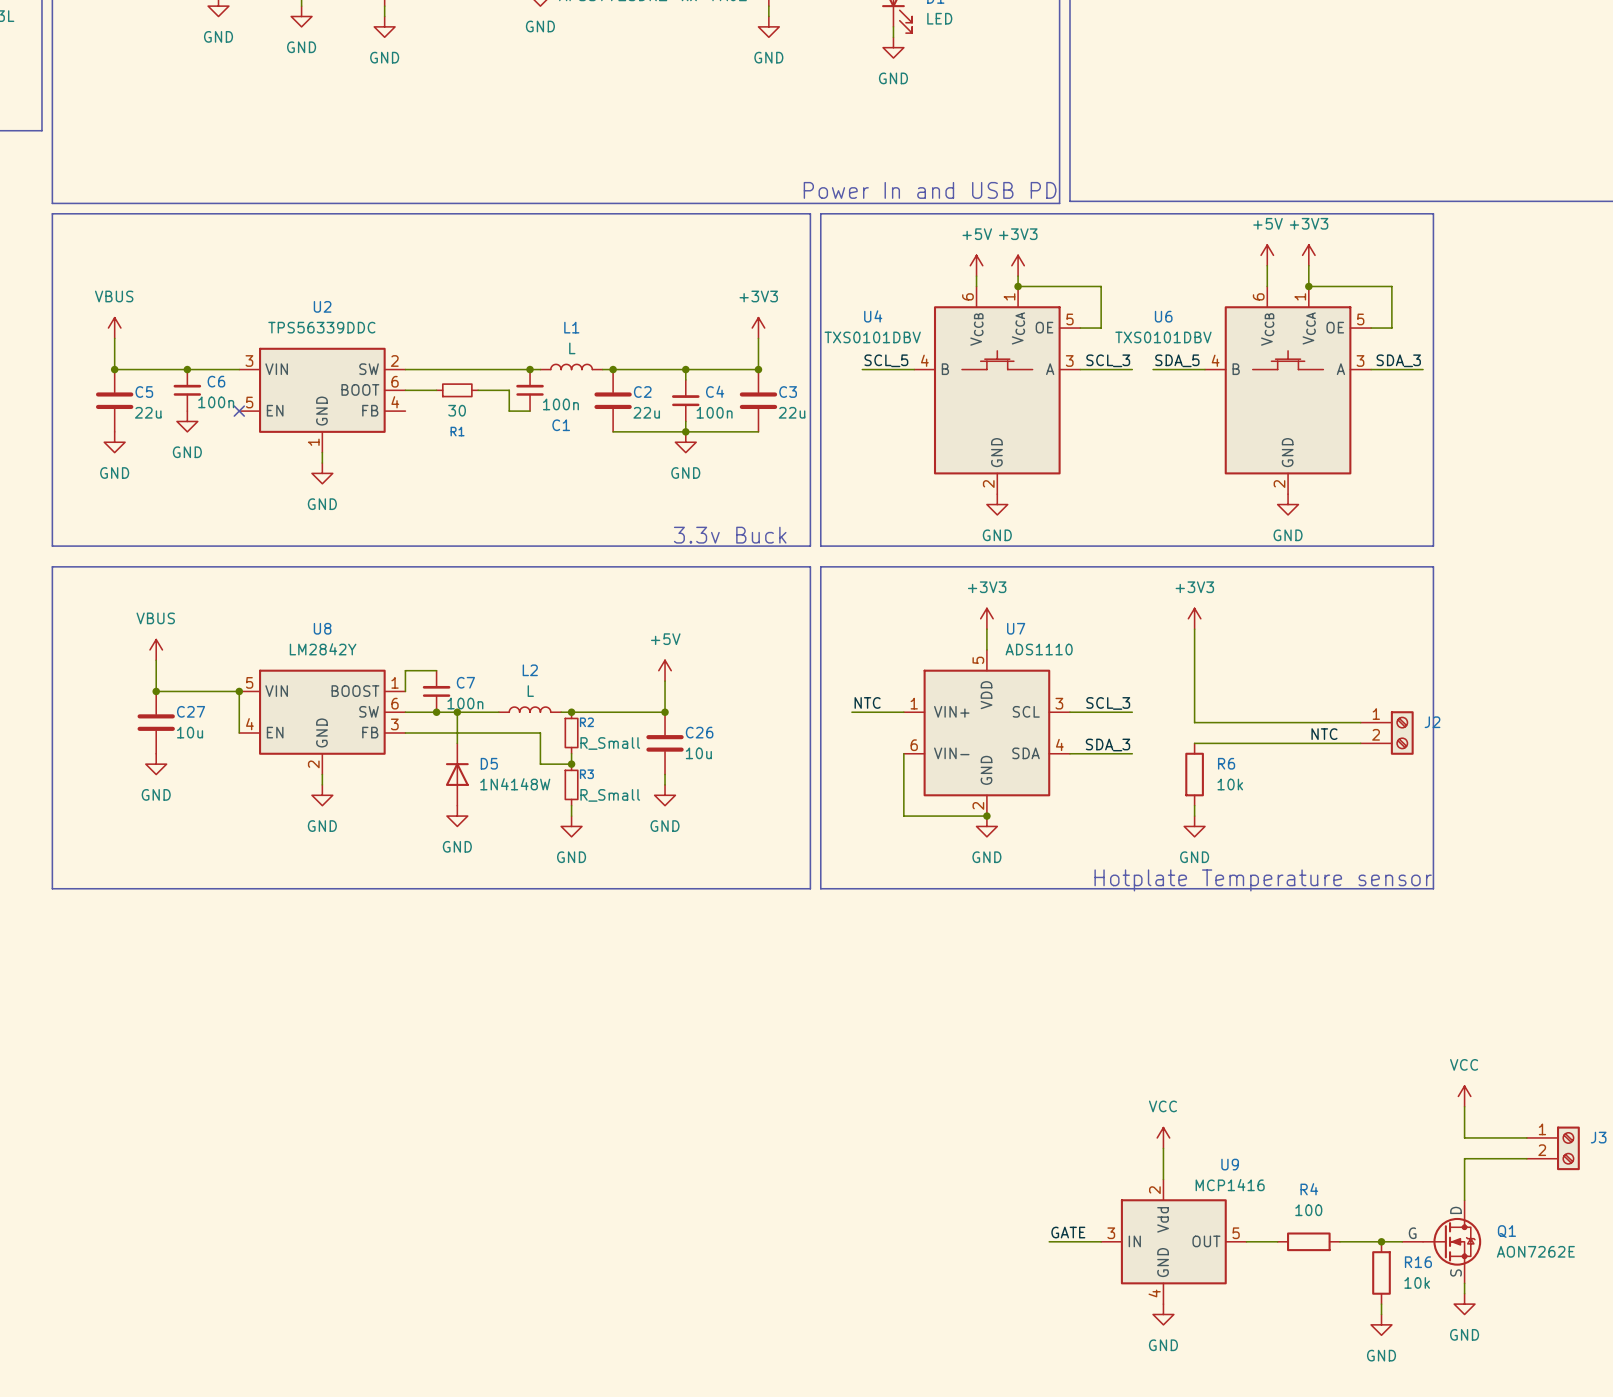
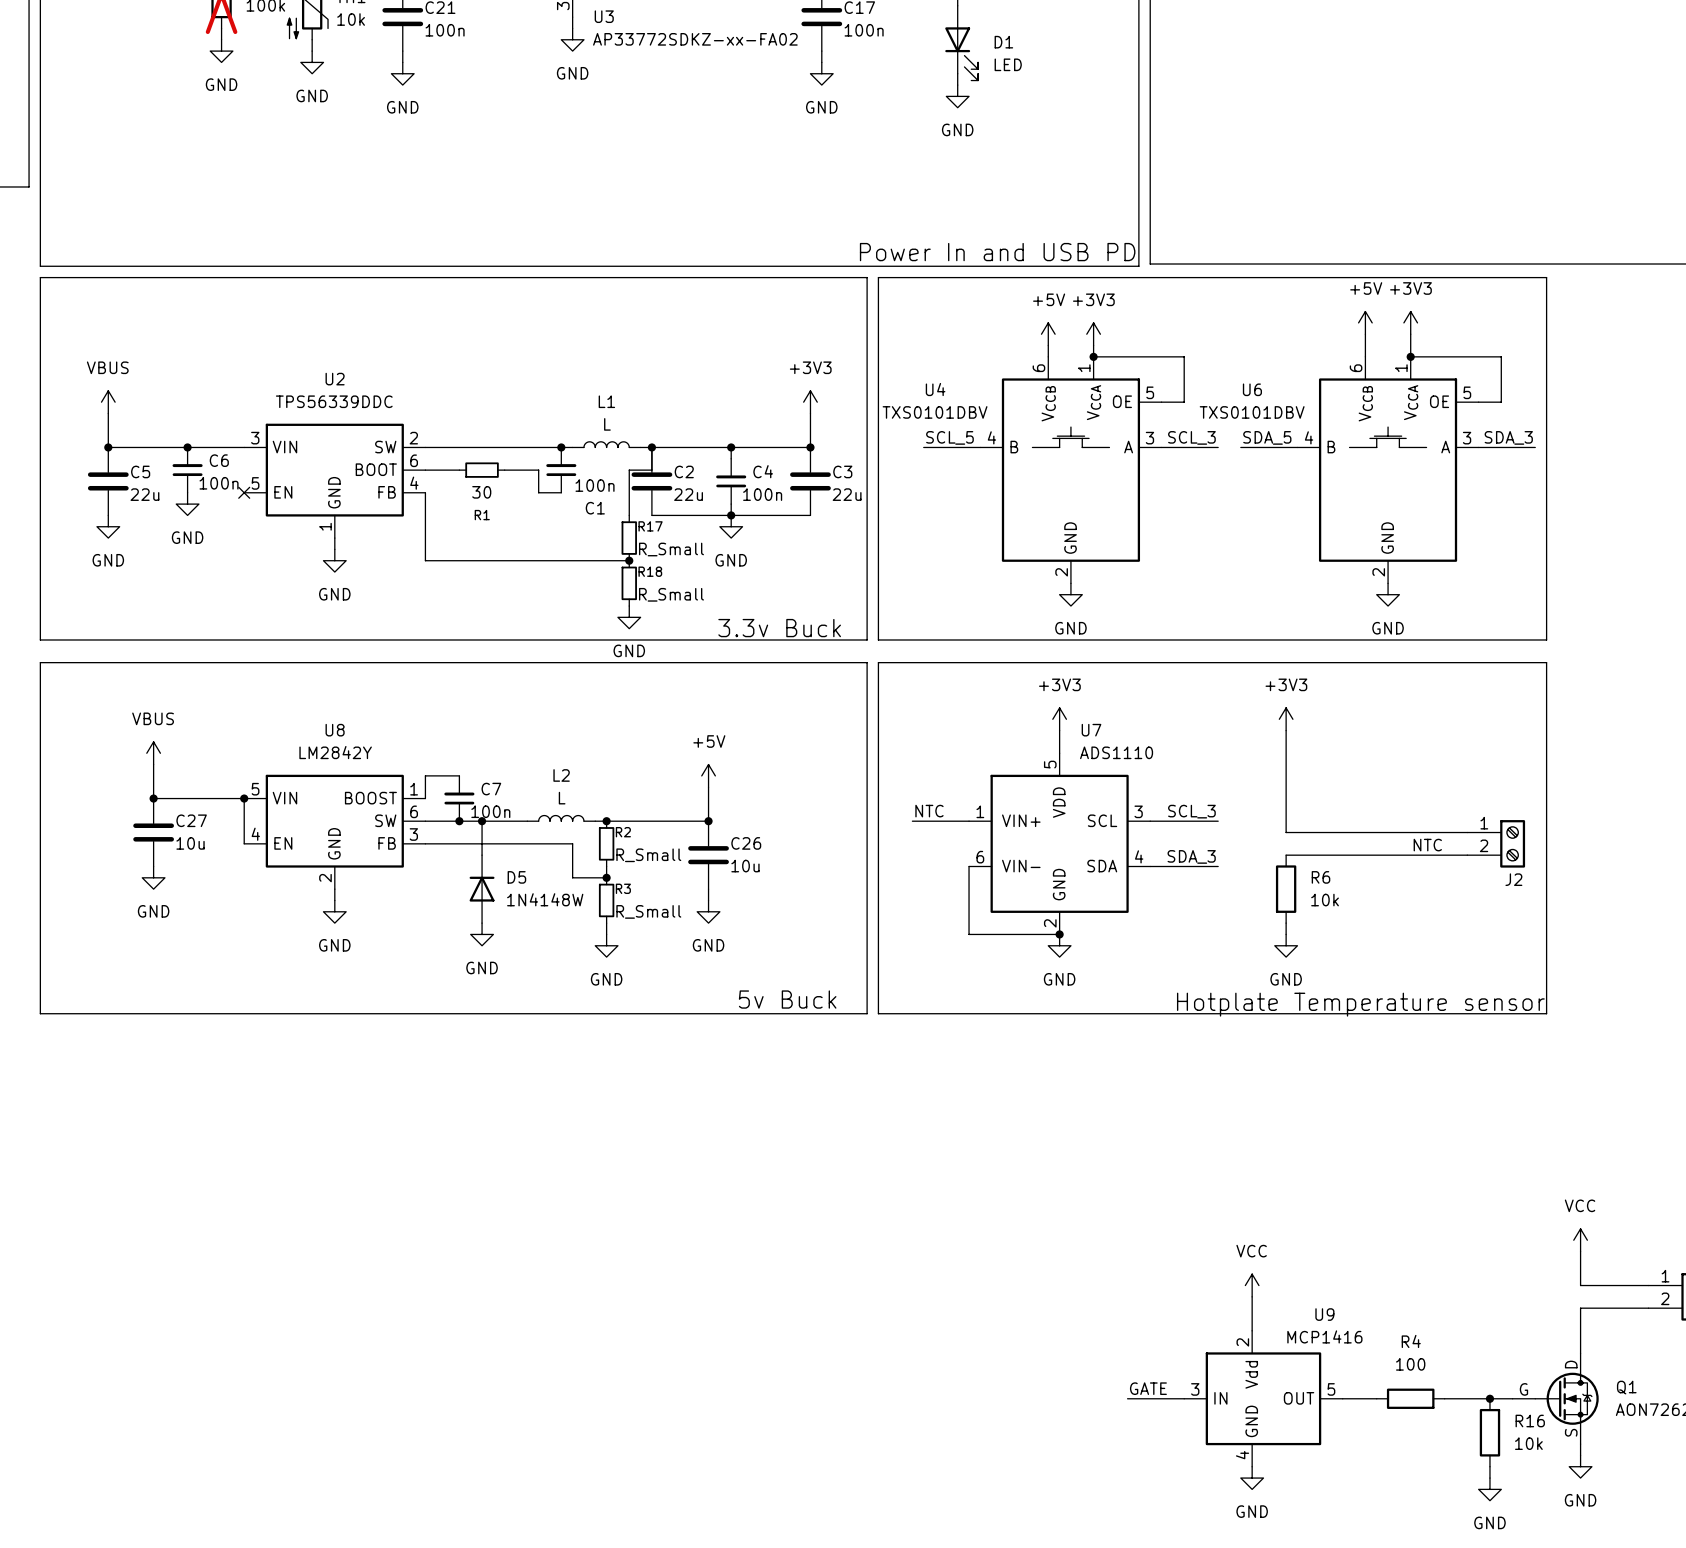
wire: none -> (651, 447) (651, 470) (629, 470) (629, 515)
wire: none -> (425, 492) (425, 560) (629, 560)
R17: none -> R_Small (629, 538)
junction: none -> (629, 560)
R18: none -> R_Small (629, 583)
power symbol: none -> GND (629, 617)
J2 name position: J2 (1432, 722) -> J2 (1513, 879)
text: none -> 5v Buck (787, 999)

